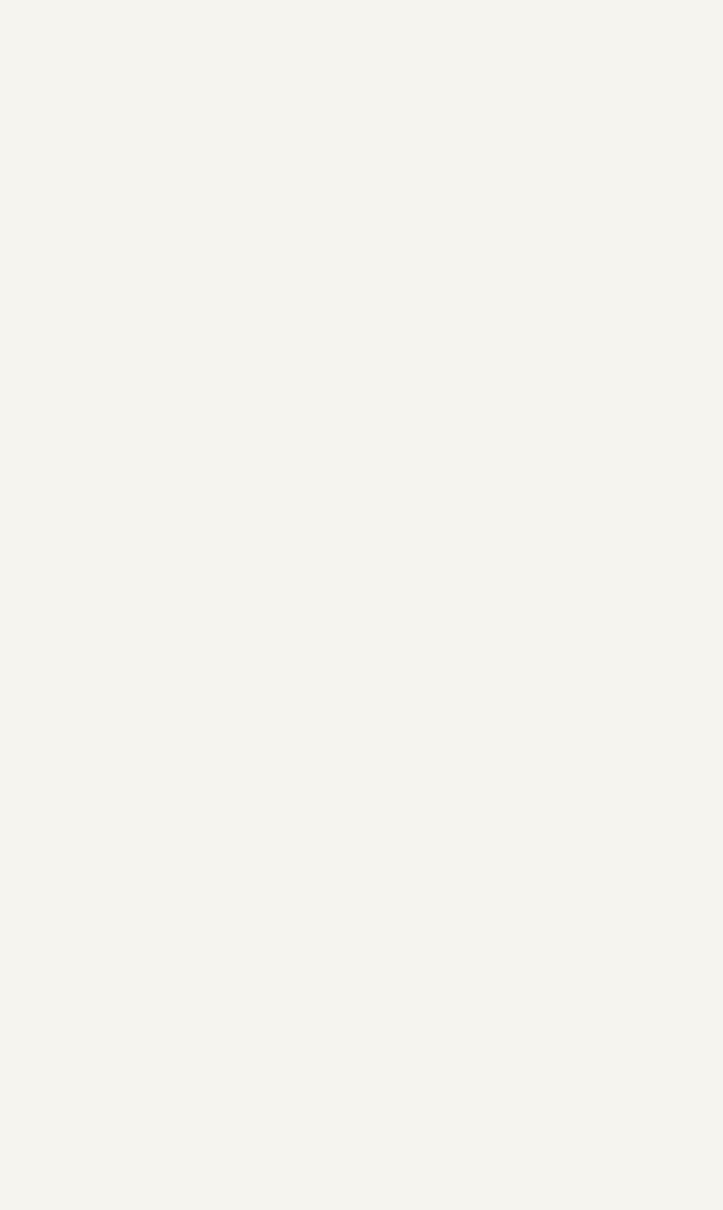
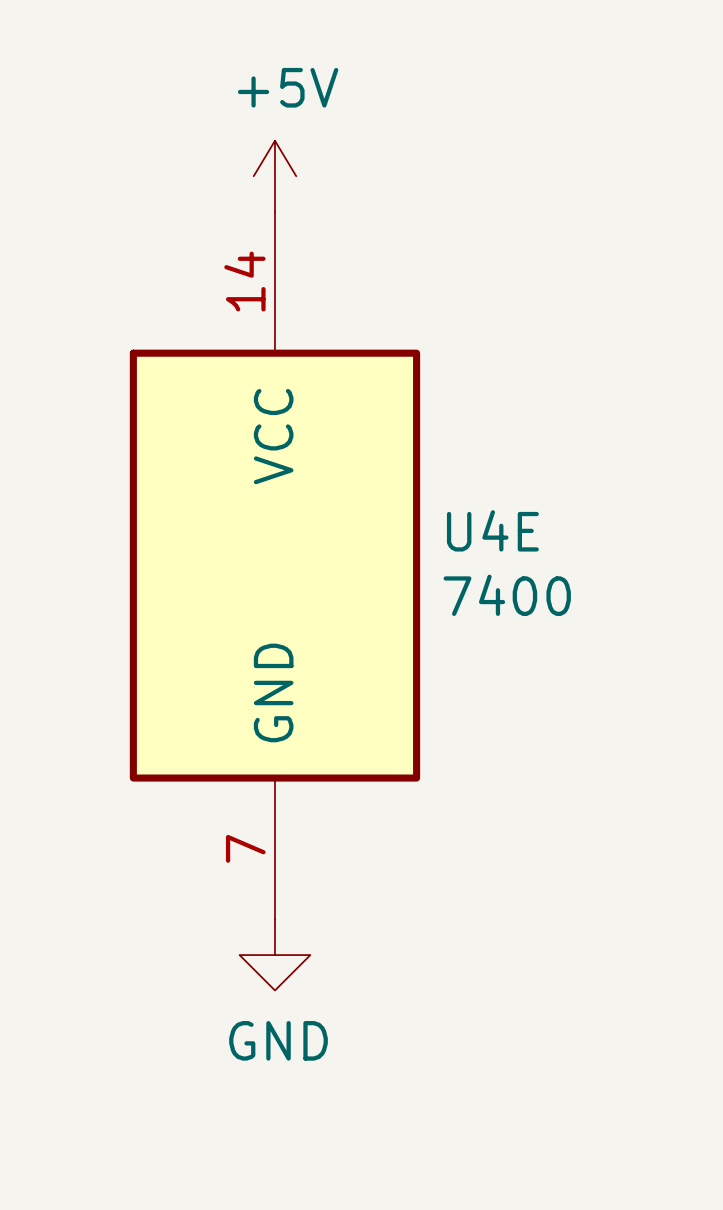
power symbol: none -> +5V (274, 176)
U4E: none -> 7400 (274, 565)
power symbol: none -> GND (274, 955)

